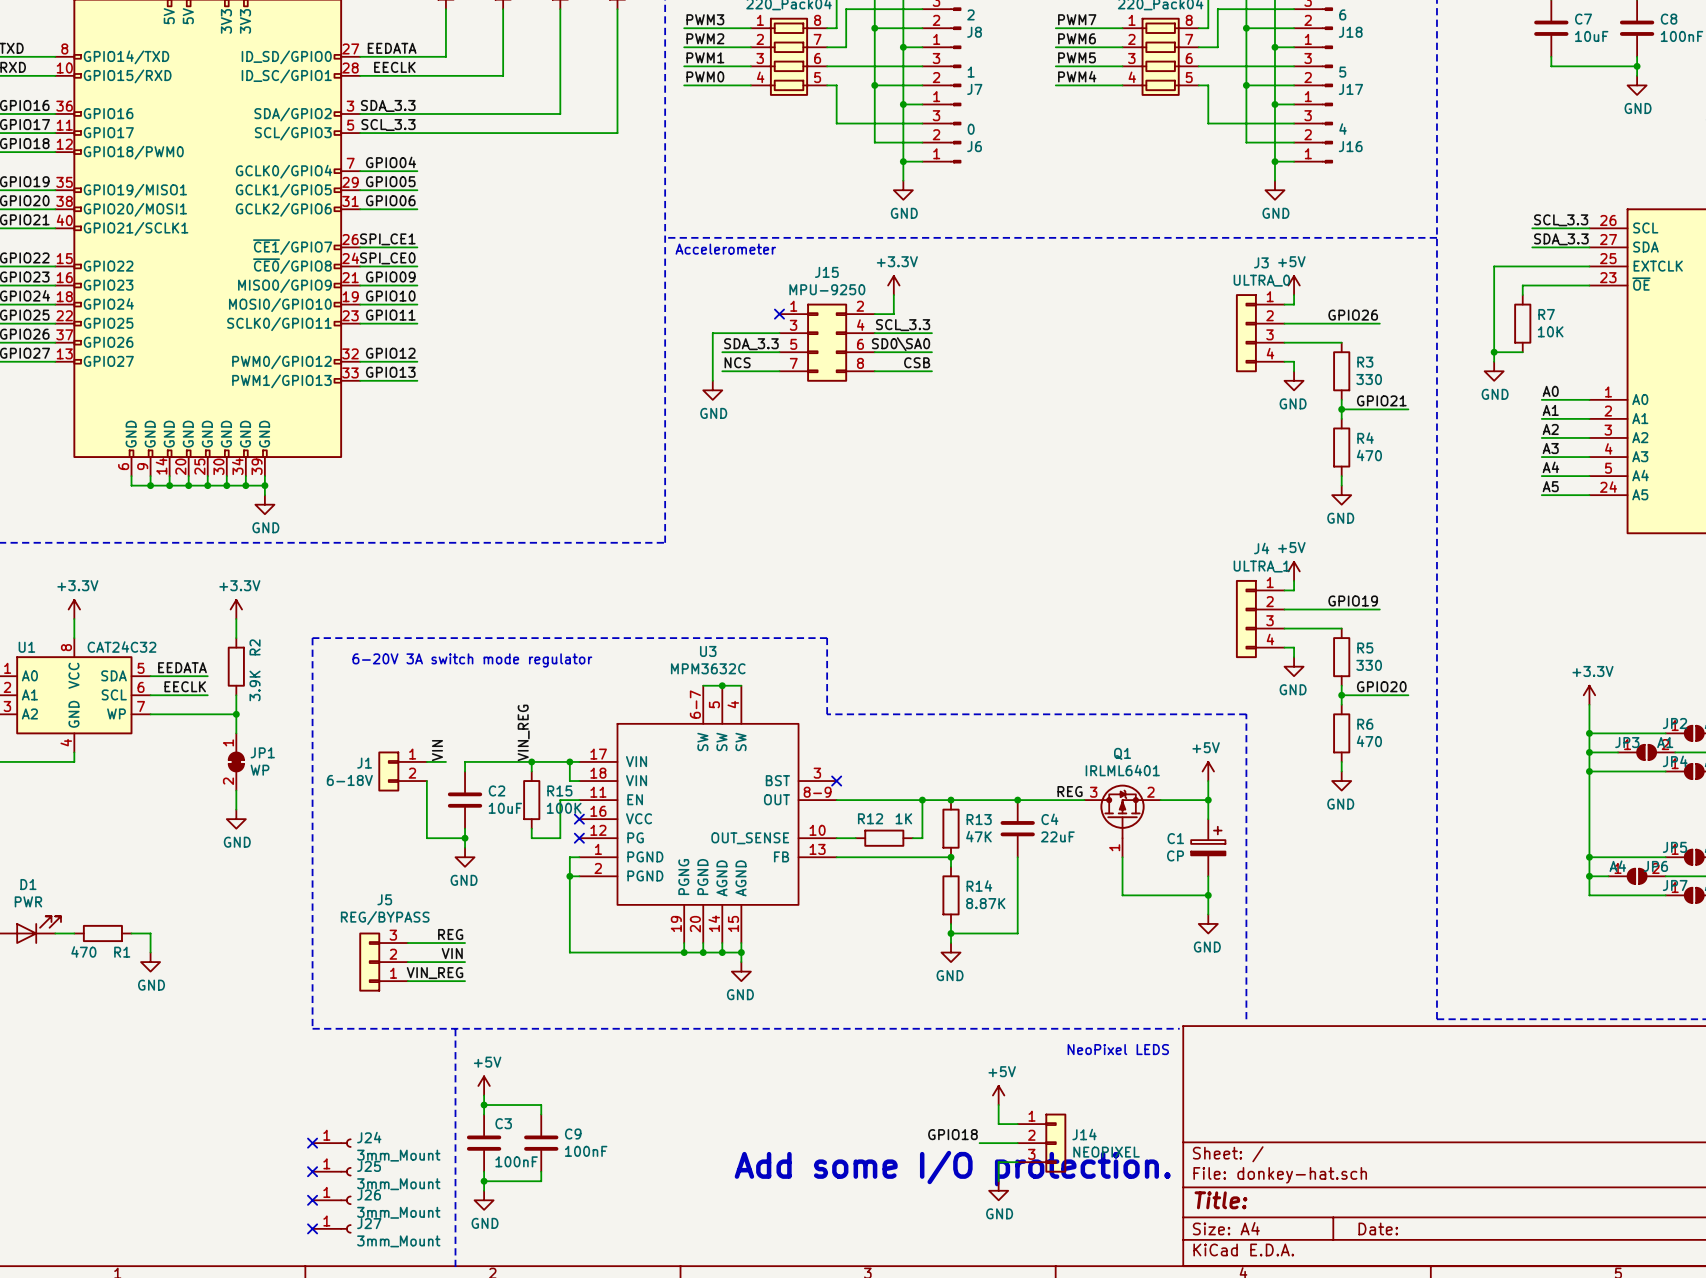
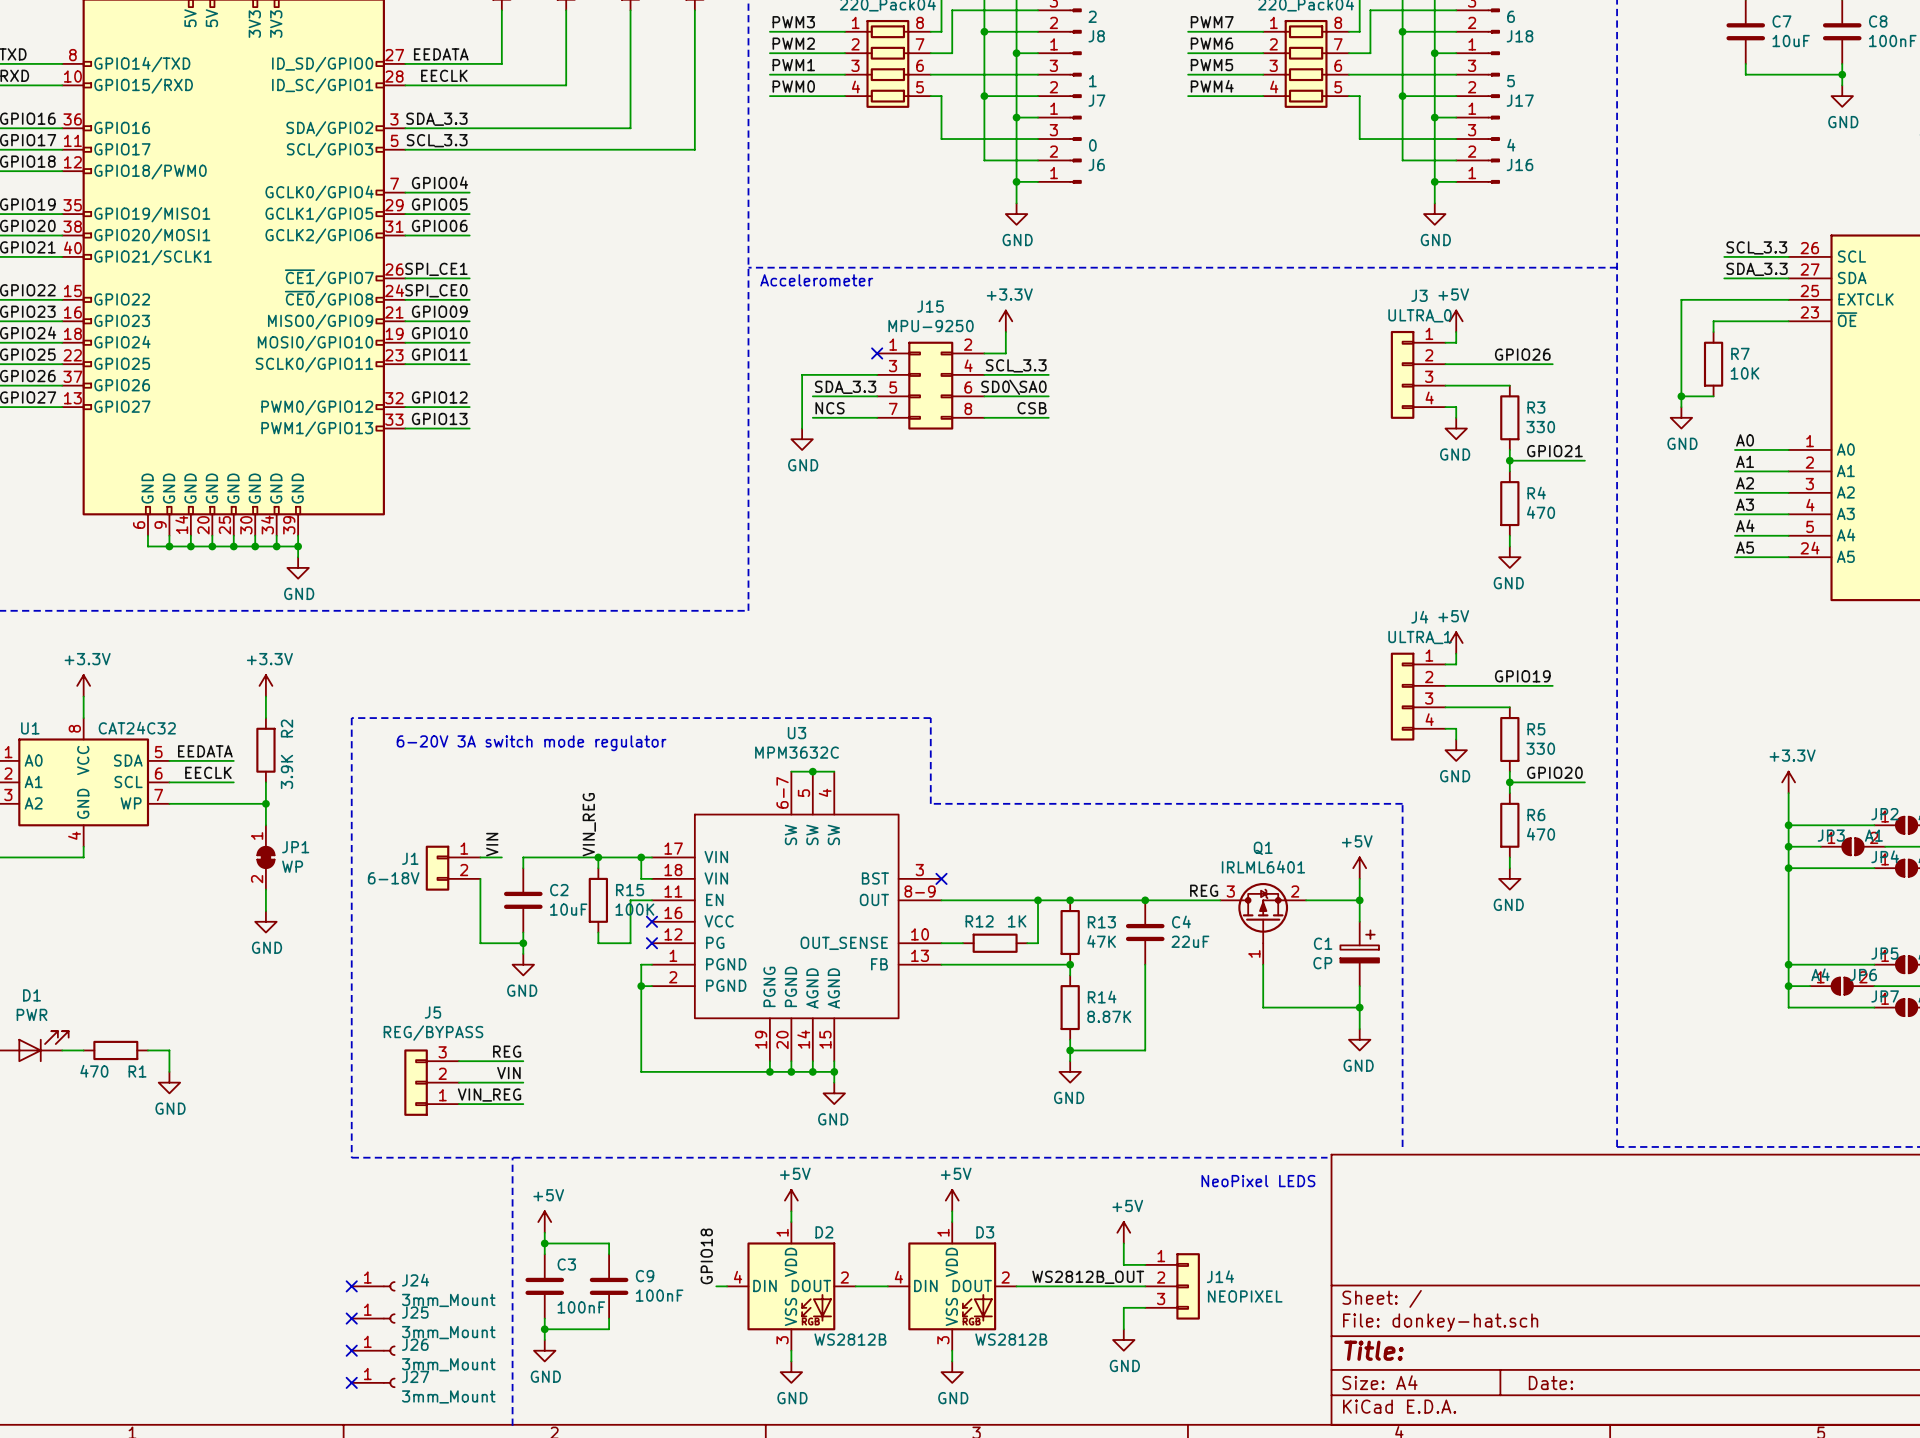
power symbol: none -> +5V (791, 1200)
power symbol: none -> +5V (952, 1200)
wire: none -> (791, 1211) (791, 1222)
wire: none -> (952, 1211) (952, 1222)
label: none -> GPIO18 (706, 1256)
label: GPIO18 (952, 1134) -> none
label: none -> WS2812B_OUT (1088, 1277)
wire: none -> (716, 1286) (727, 1286)
D2: none -> WS2812B (791, 1286)
wire: none -> (855, 1286) (887, 1286)
D3: none -> WS2812B (952, 1286)
wire: none -> (1016, 1286) (1102, 1286)
text: Add some I/O protection. (952, 1168) -> none
wire: none -> (791, 1350) (791, 1361)
wire: none -> (952, 1350) (952, 1361)
power symbol: none -> GND (791, 1372)
power symbol: none -> GND (952, 1372)

